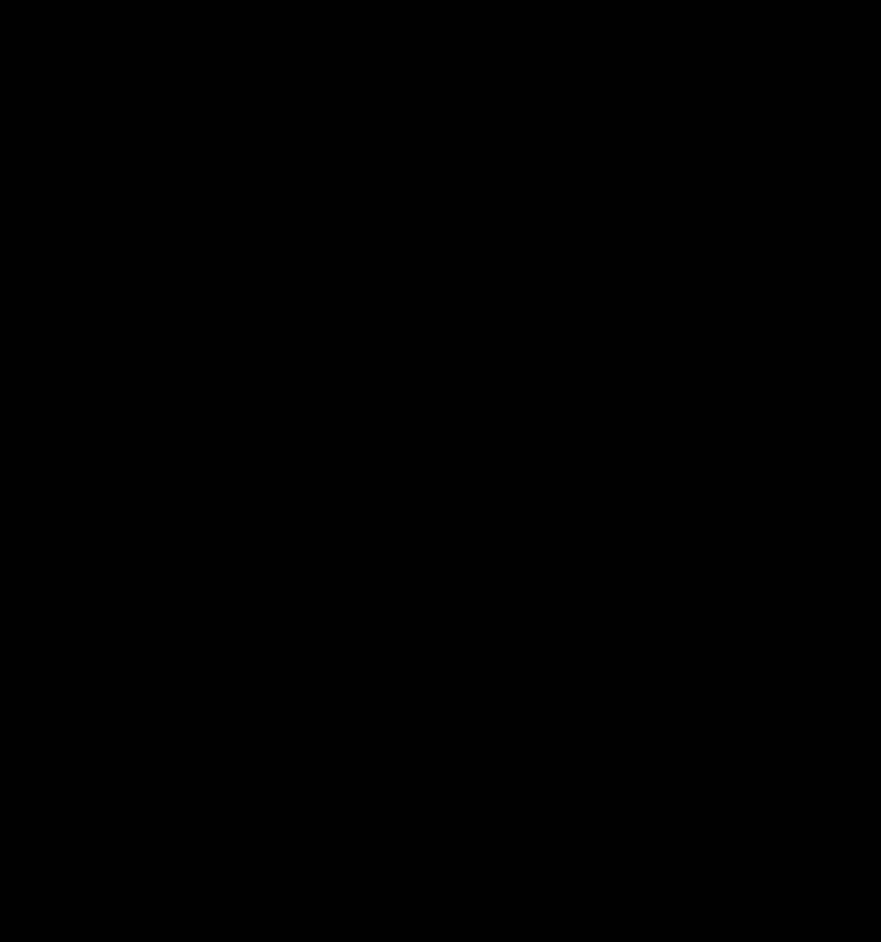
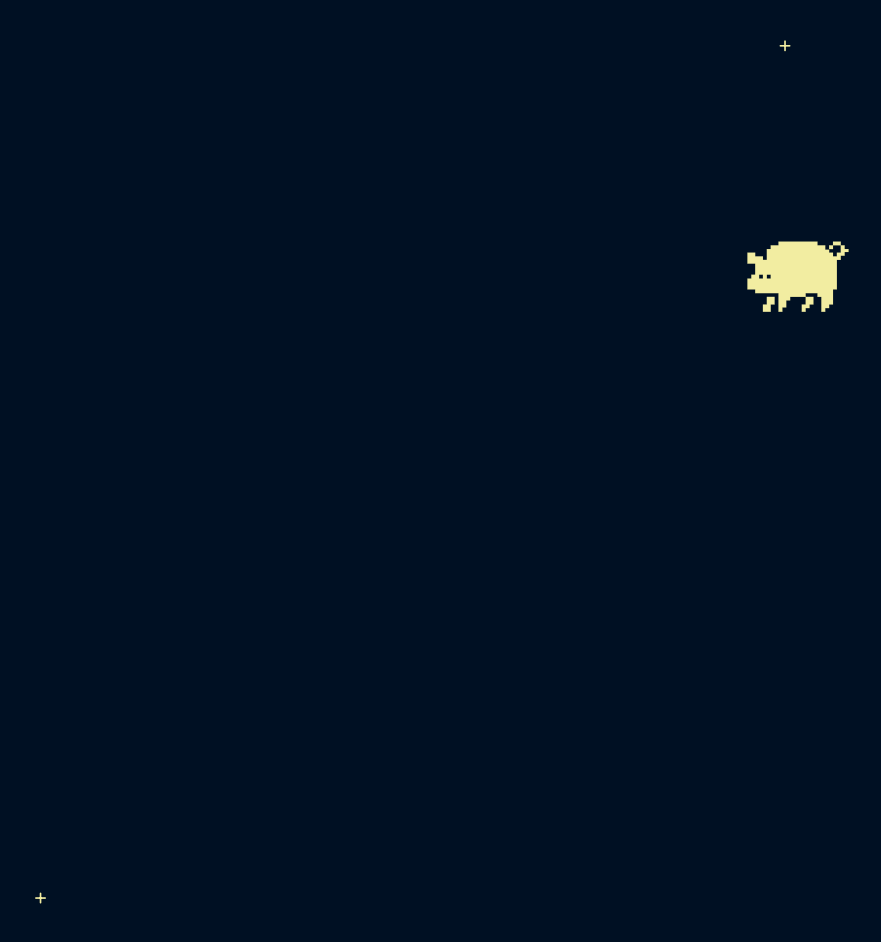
text: none -> + (785, 45)
drawing: none -> [747, 241, 849, 312]
text: none -> + (40, 898)

